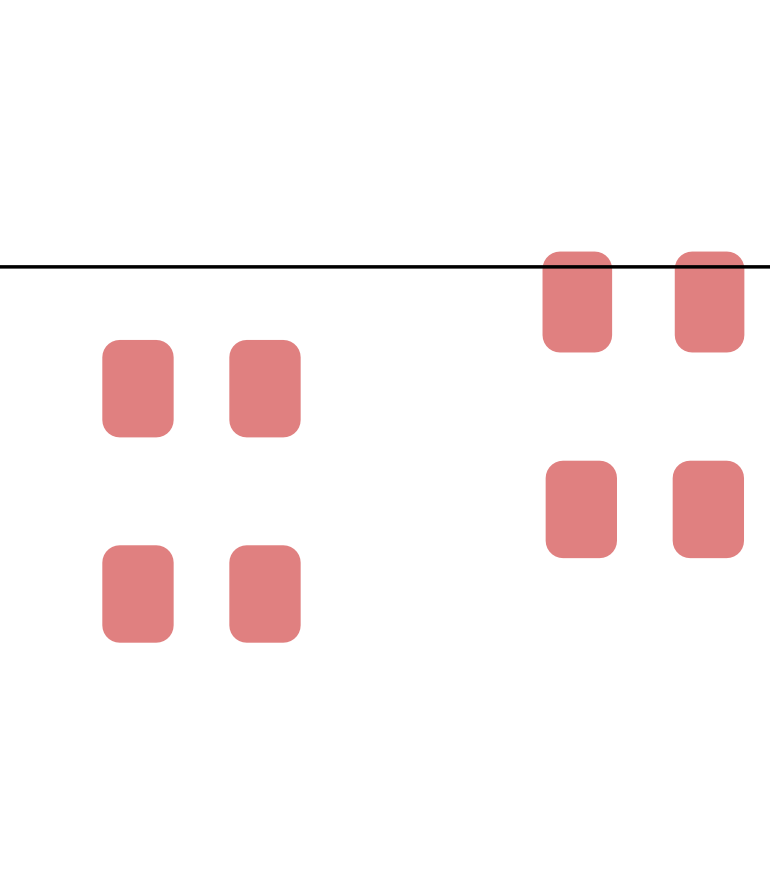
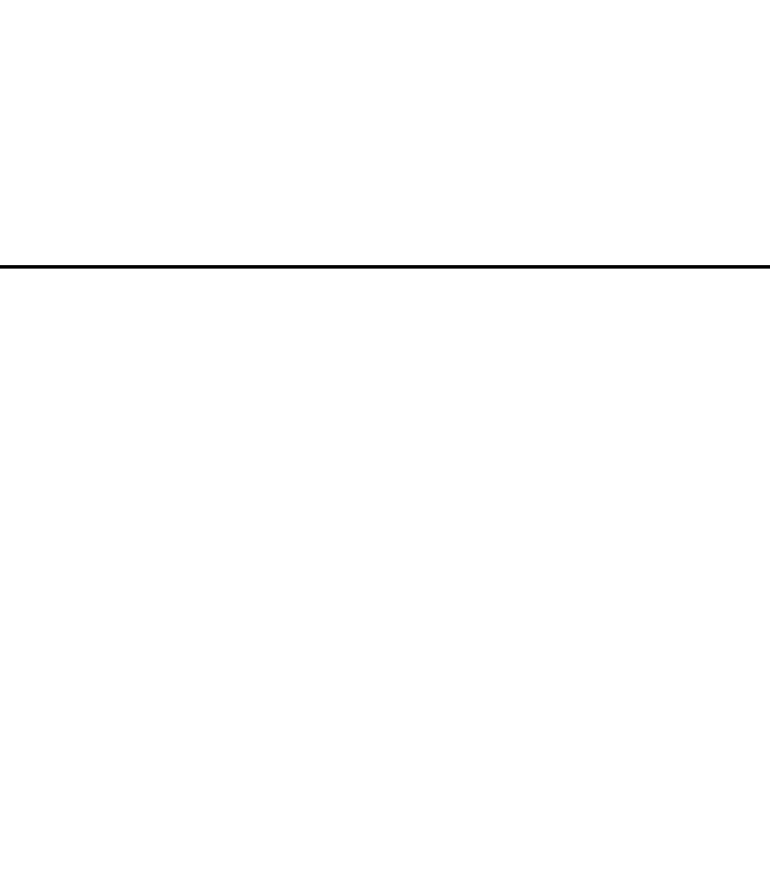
part: (643, 302) -> none
part: (201, 388) -> none
part: (644, 509) -> none
part: (201, 593) -> none

